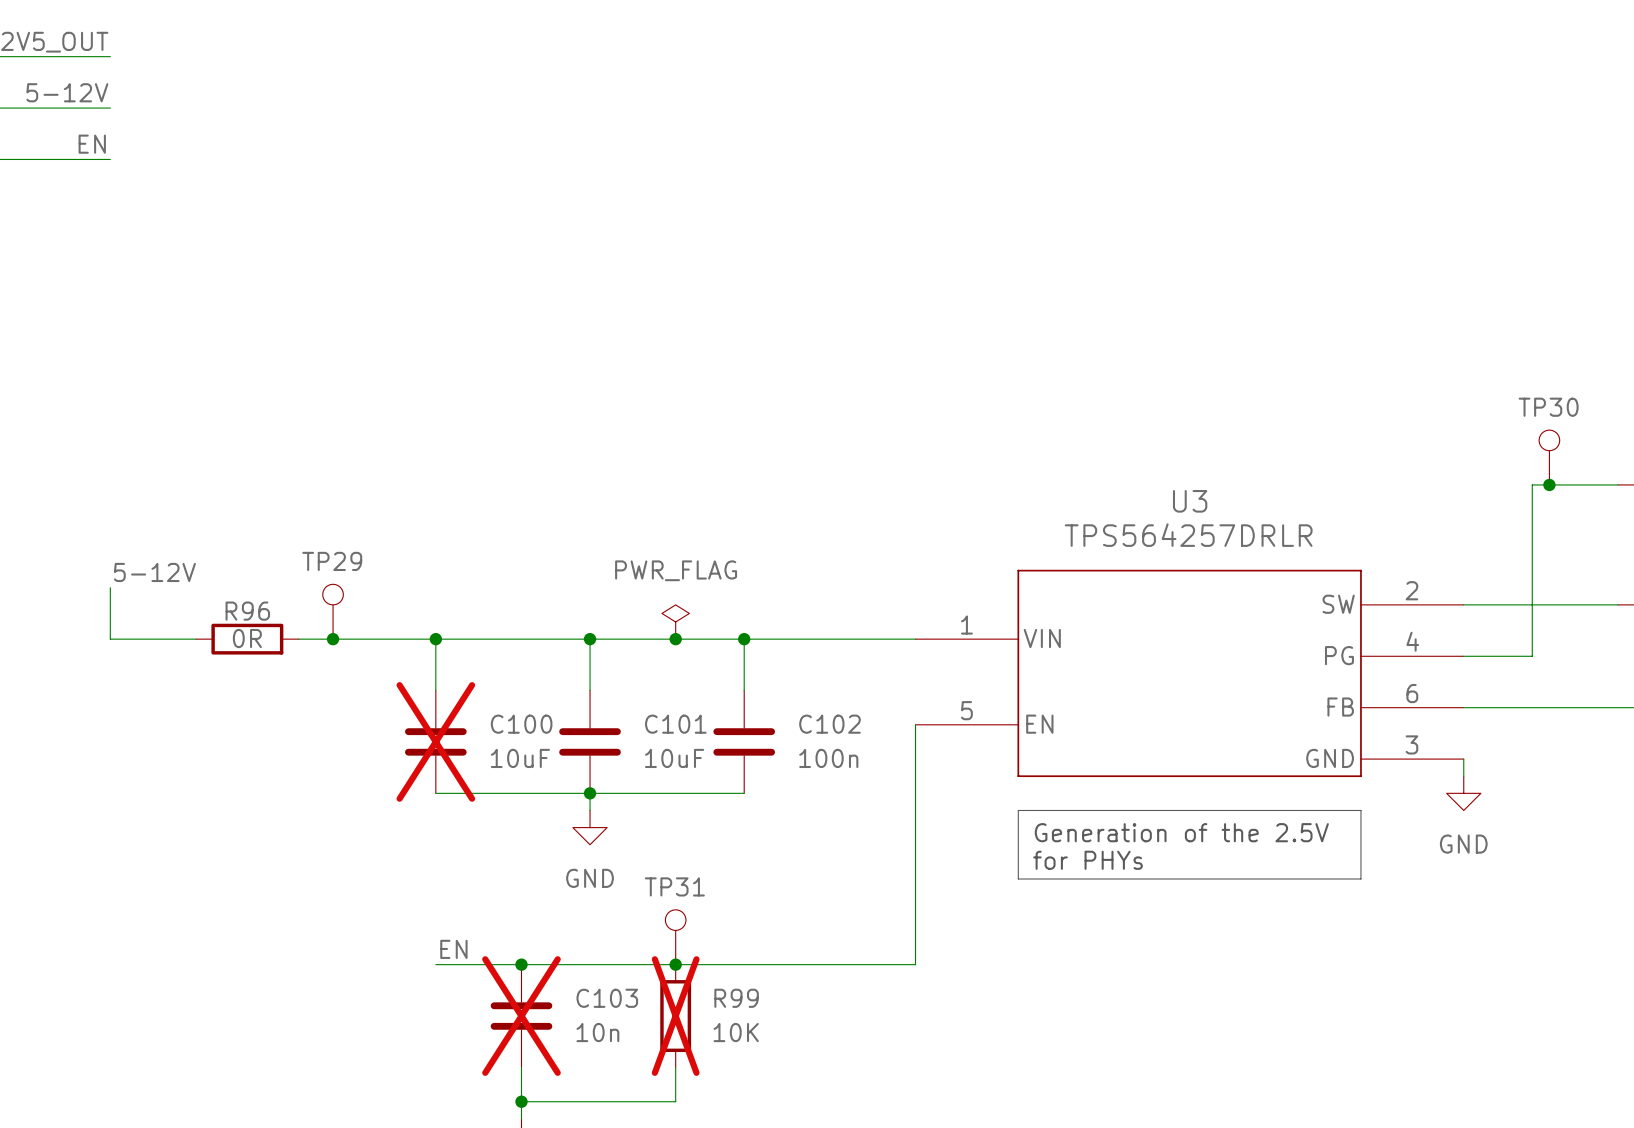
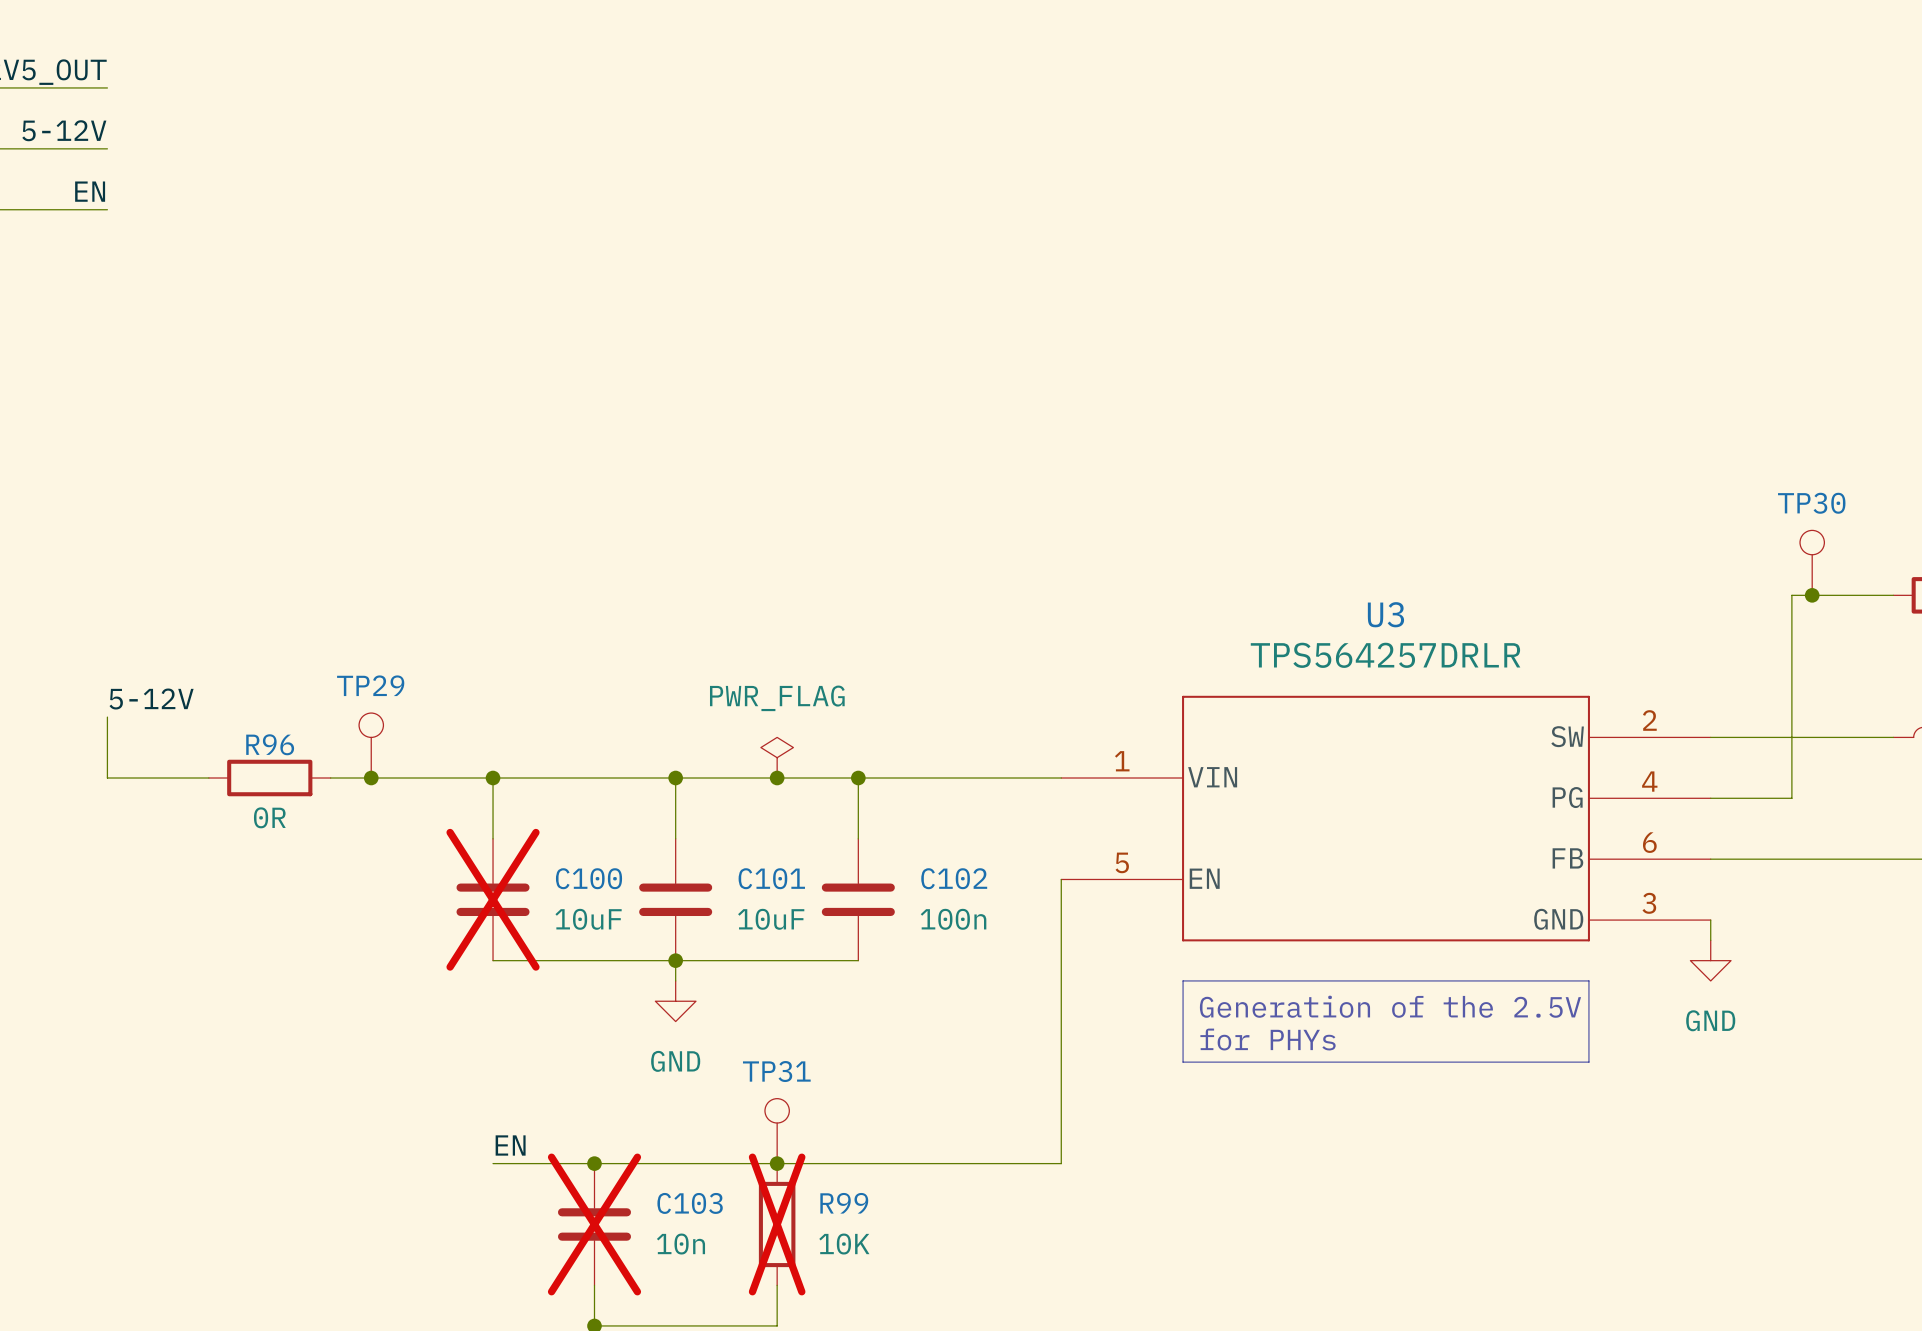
R96 value position: 0R (247, 638) -> 0R (269, 817)

